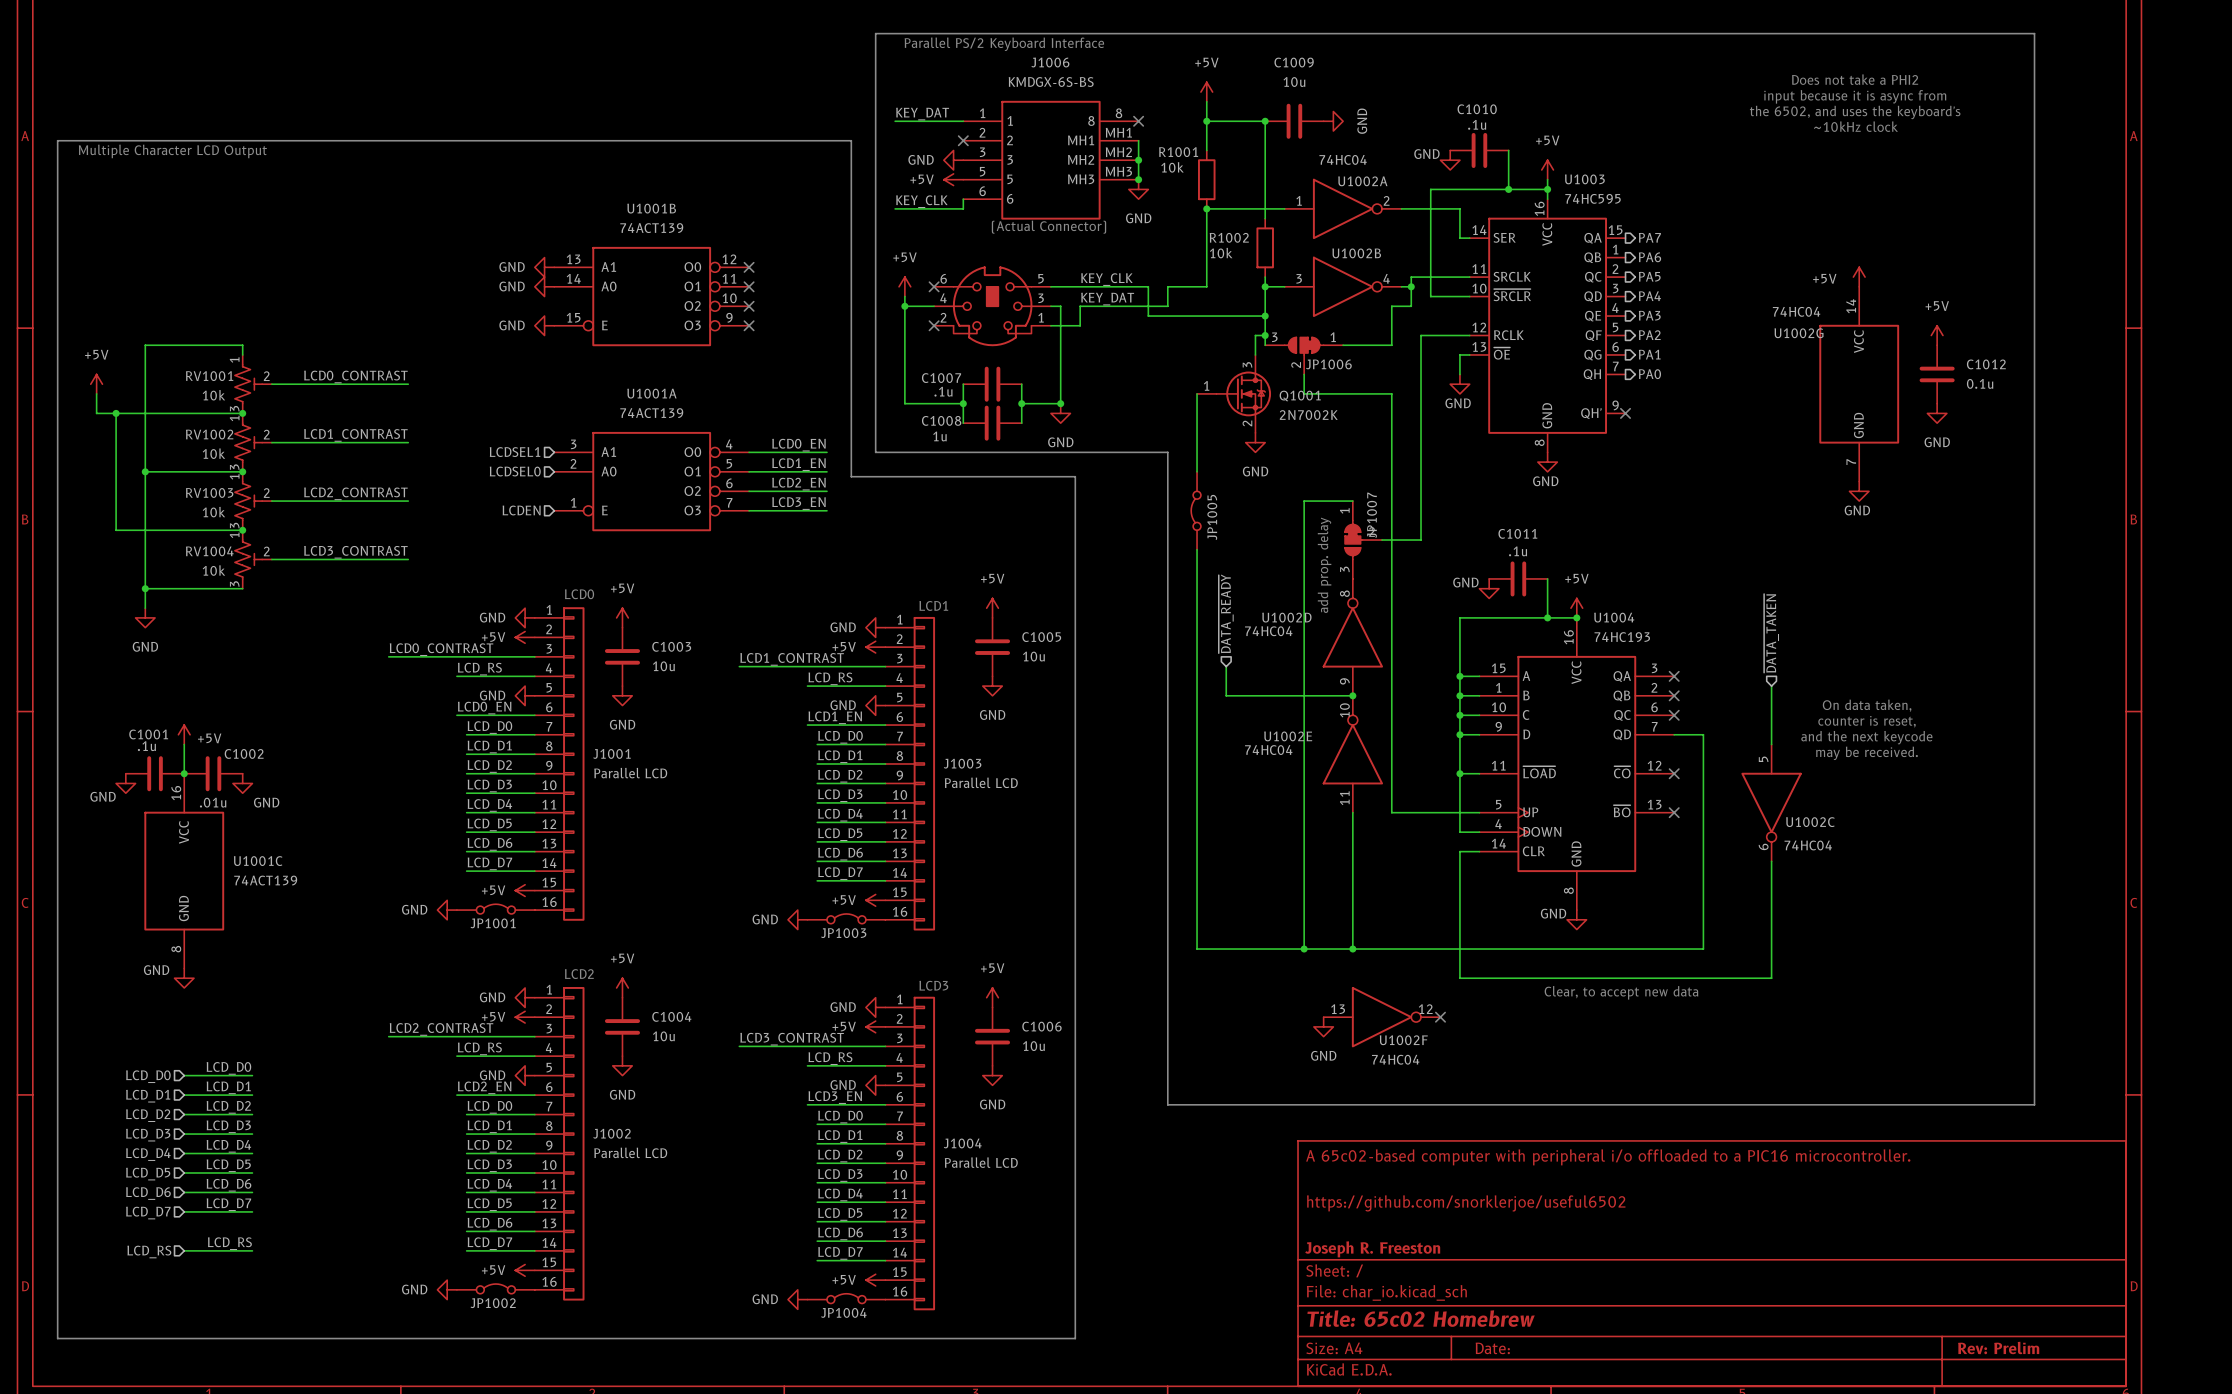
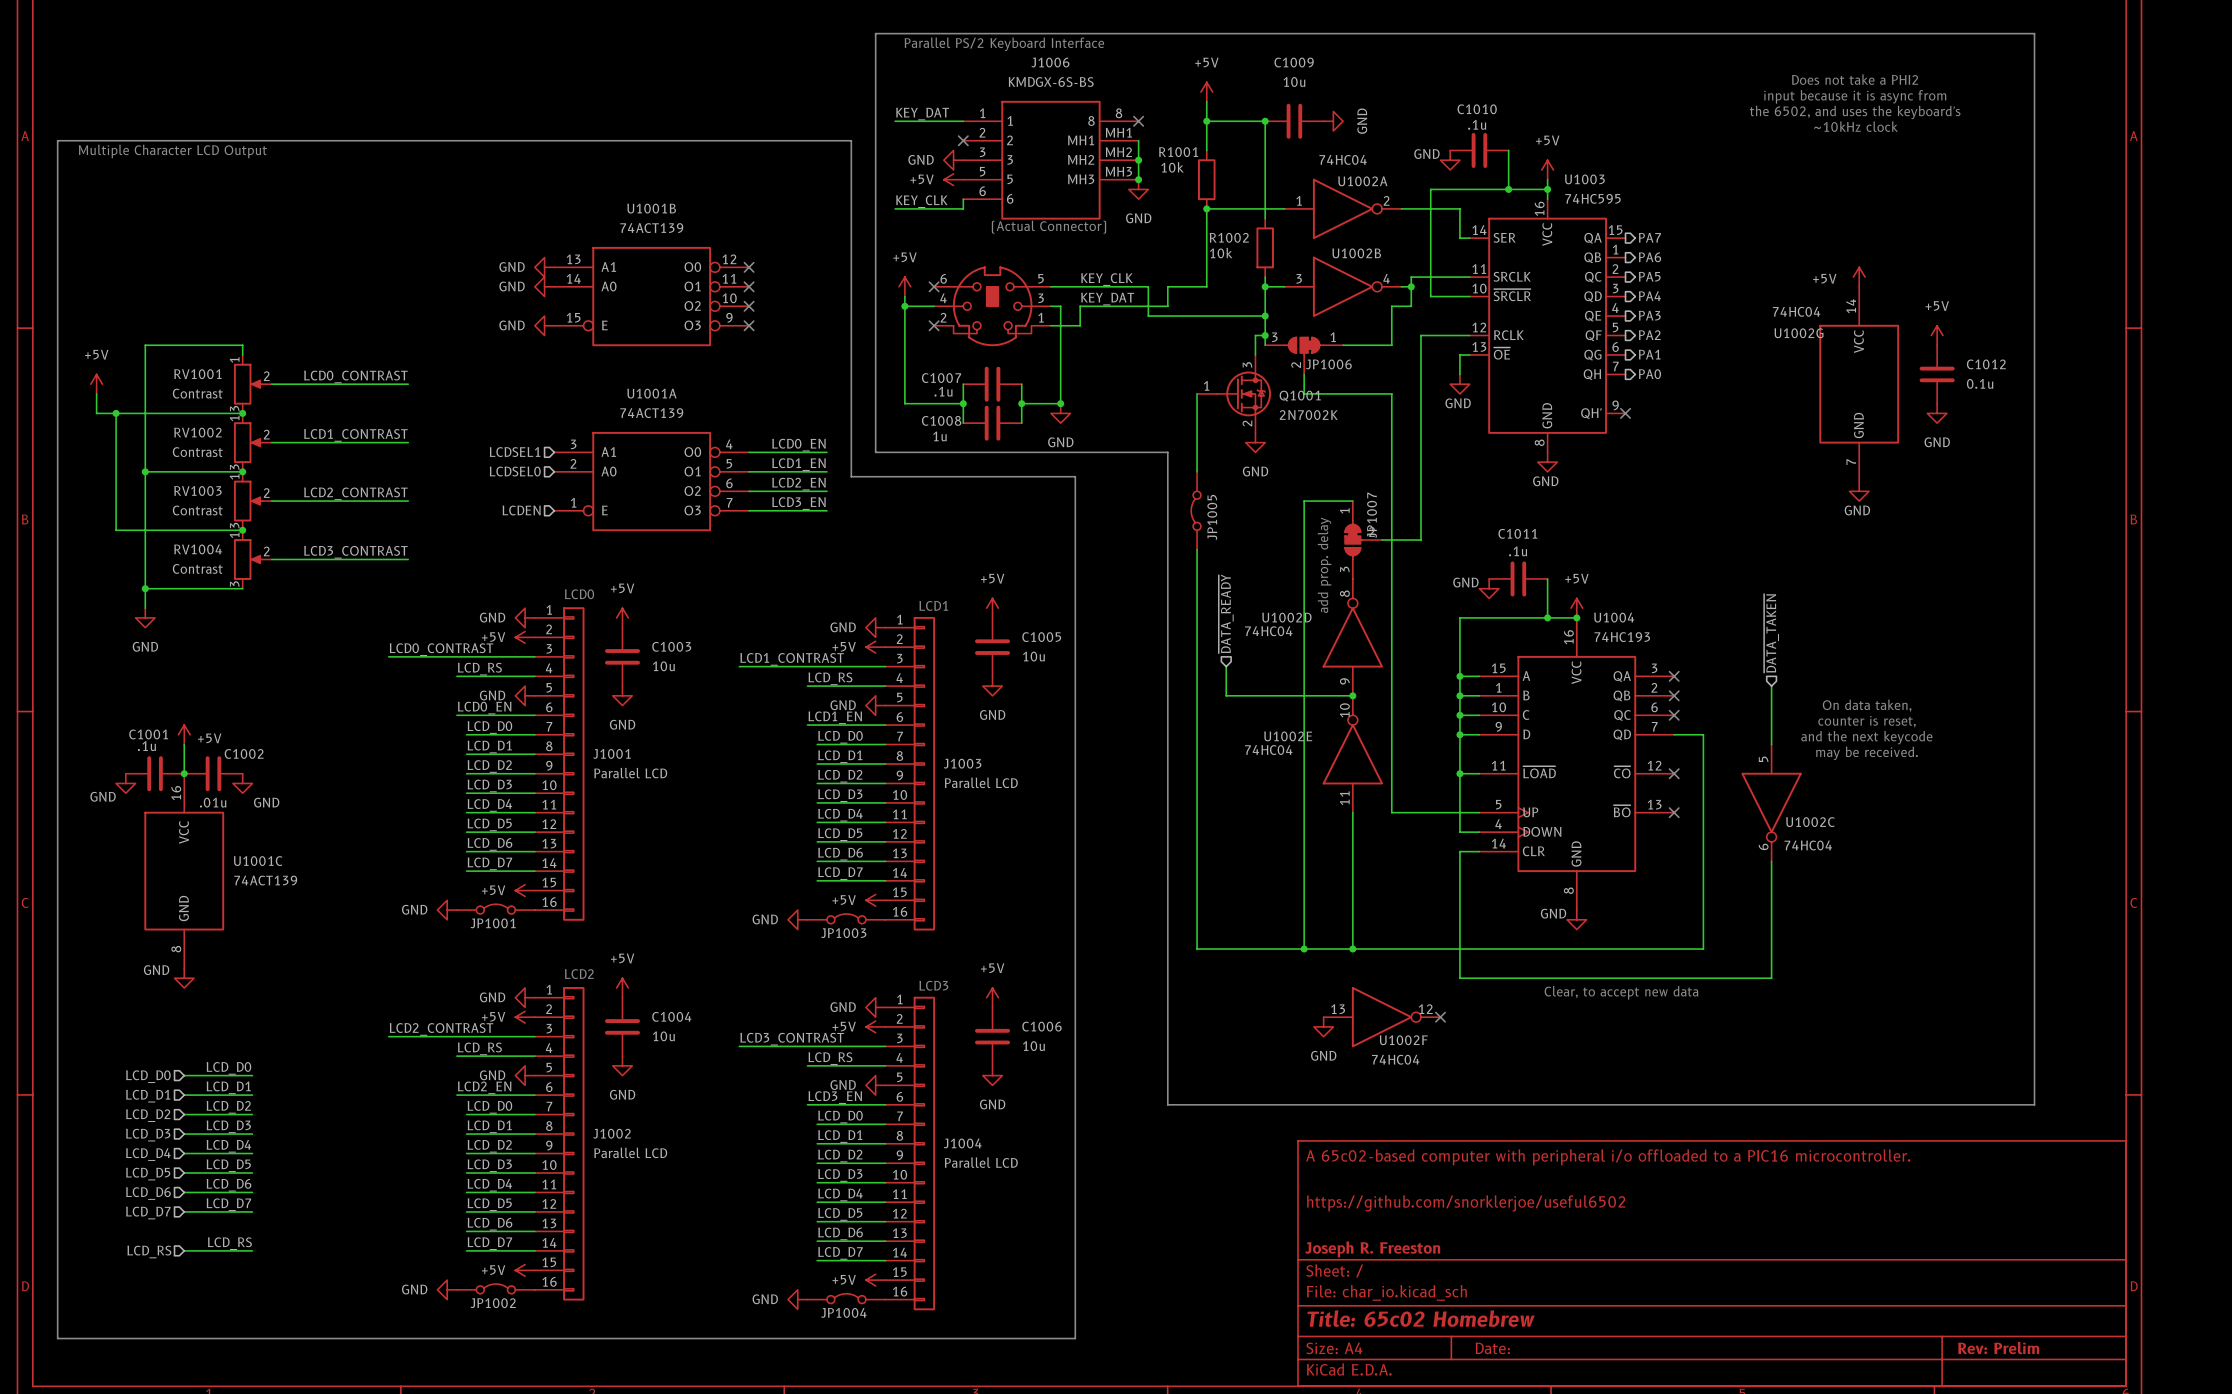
RV1001 symbol: [234, 354, 272, 414] -> [233, 354, 272, 414]
RV1001 value: 10k (213, 395) -> Contrast (197, 393)
RV1002 symbol: [234, 413, 272, 472] -> [233, 413, 272, 472]
RV1002 value: 10k (213, 453) -> Contrast (197, 452)
RV1003 symbol: [234, 471, 272, 531] -> [233, 471, 272, 531]
RV1003 value: 10k (213, 512) -> Contrast (197, 510)
RV1004 symbol: [234, 530, 272, 589] -> [233, 530, 272, 589]
RV1004 value: 10k (213, 570) -> Contrast (197, 568)

